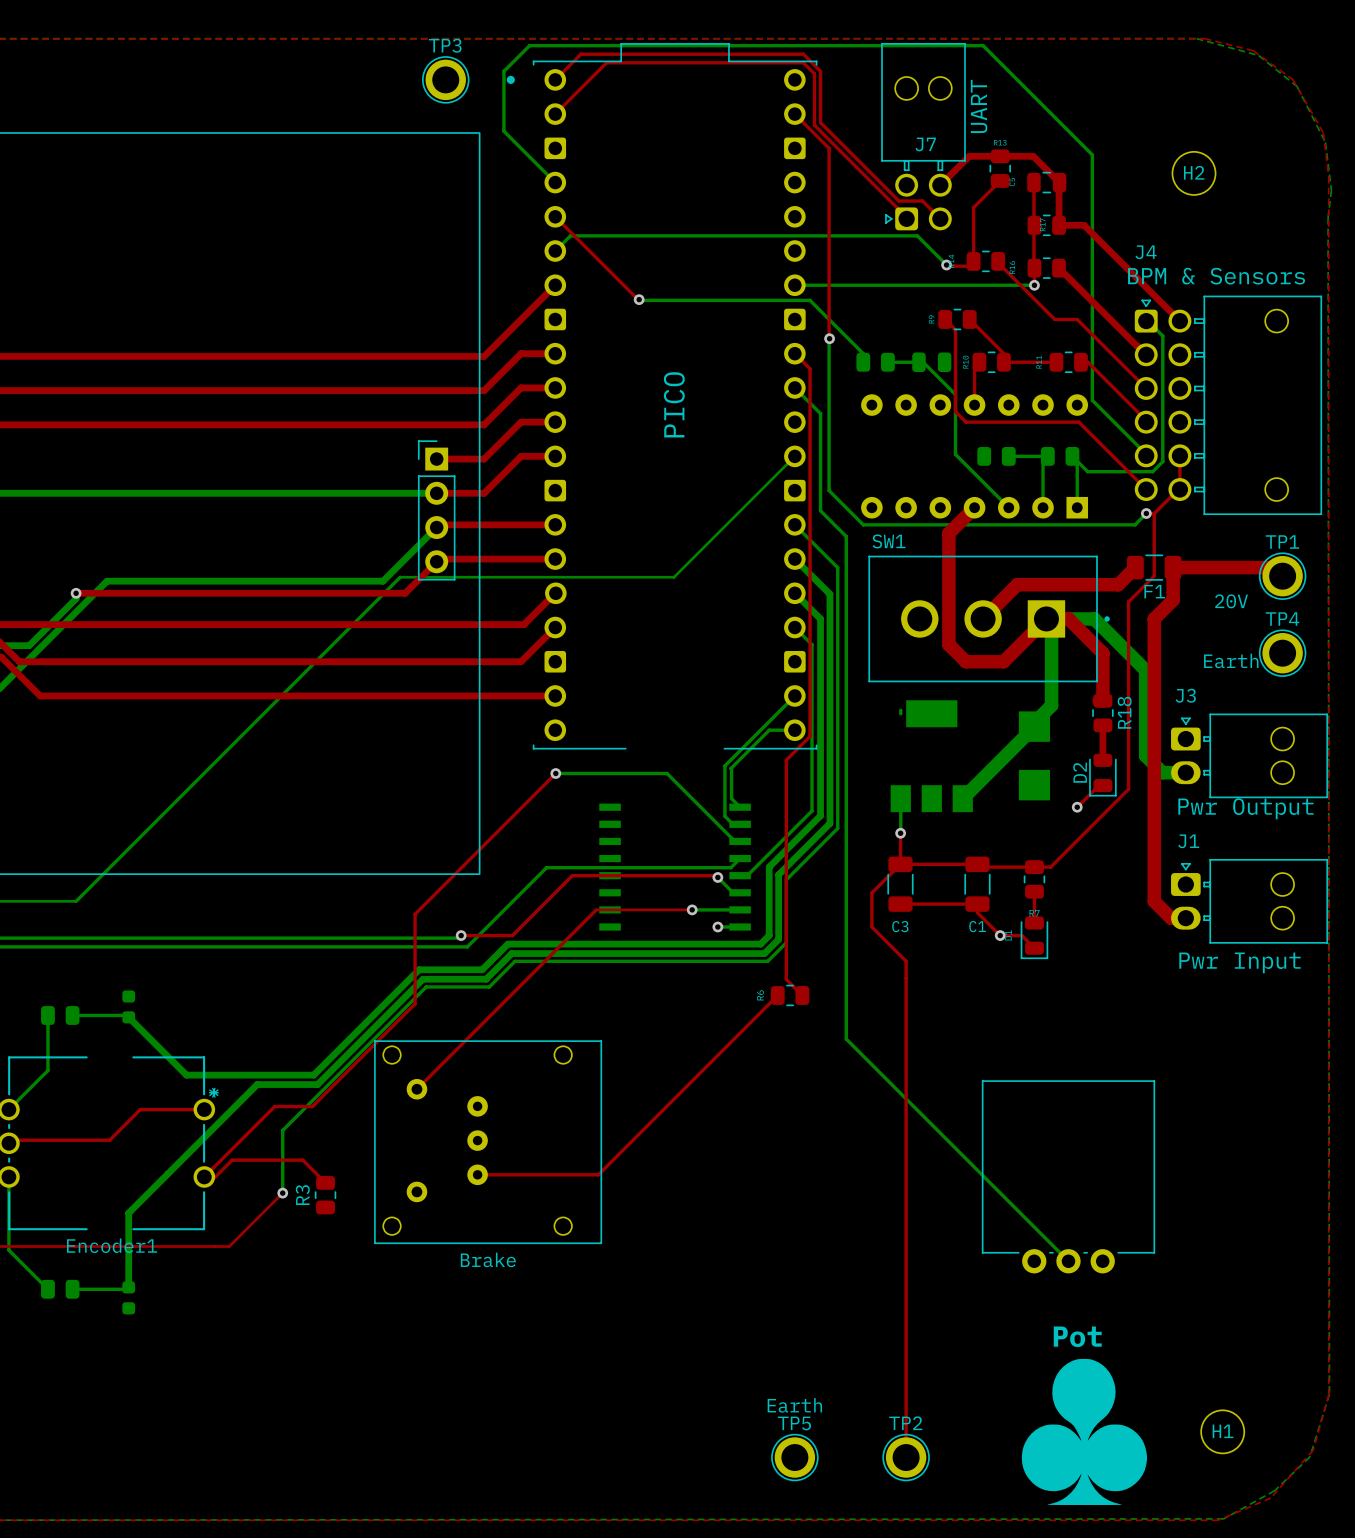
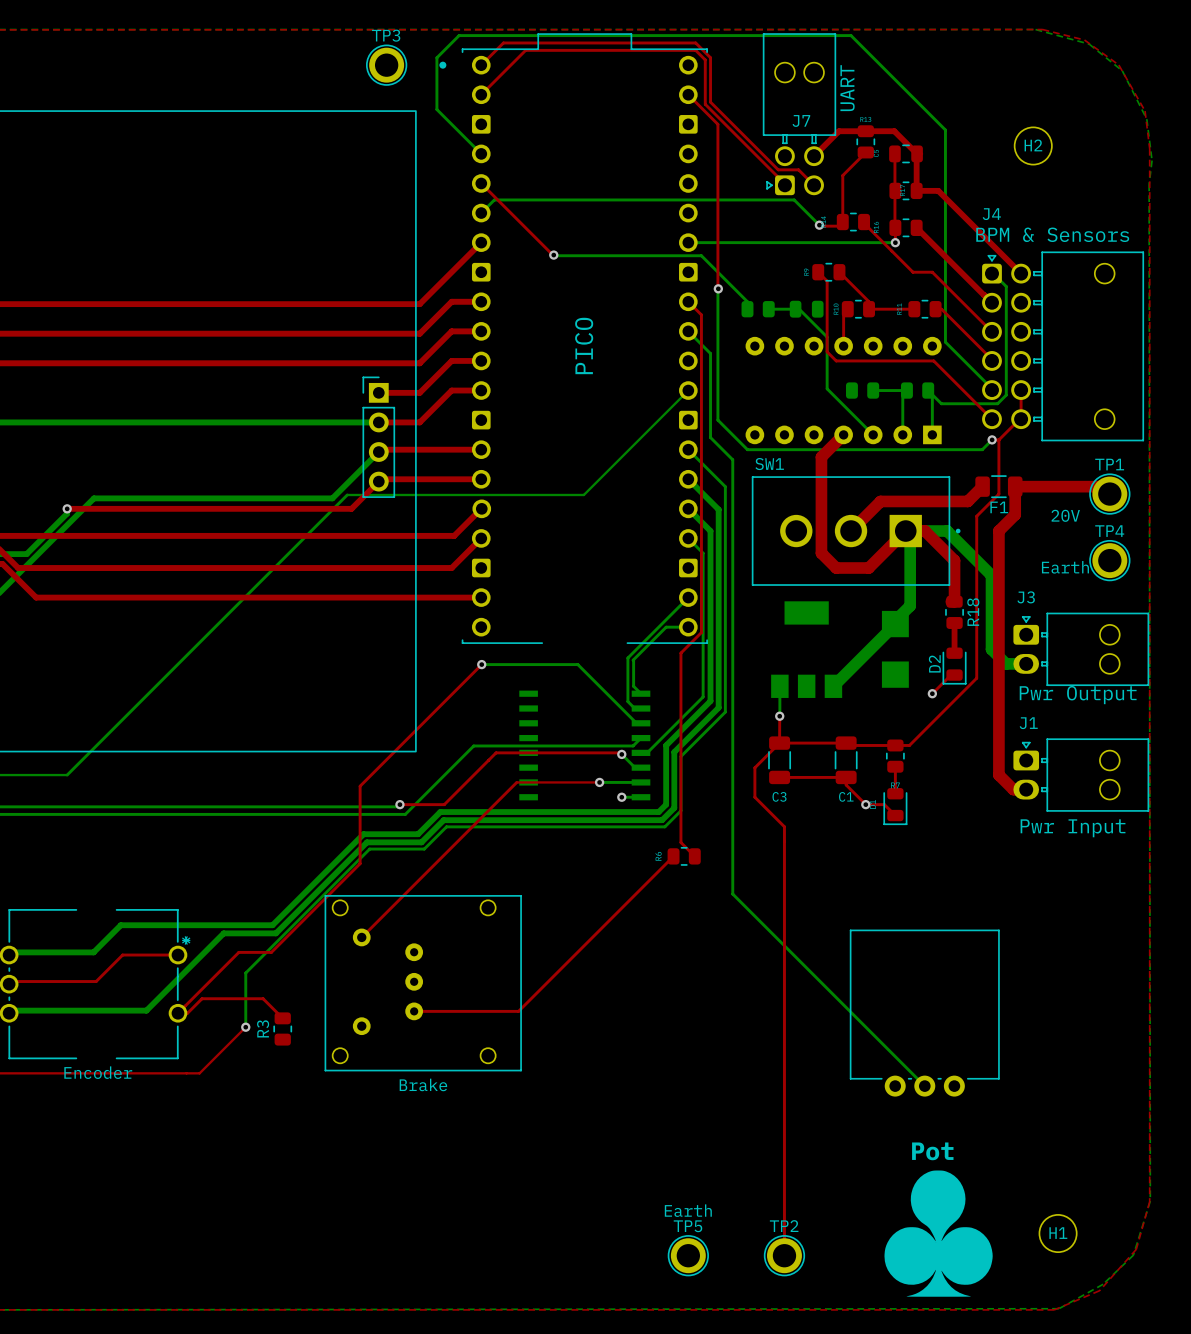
bottom track: (900, 710) (900, 713) -> none
part: (128, 1006) -> none
bottom track: (47, 1015) (47, 1070) (8, 1109) -> none
part: (60, 1015) -> none
bottom track: (72, 1015) (126, 1015) (186, 1075) -> (11, 952) (93, 952) (120, 925) (162, 925)
bottom track: (167, 1173) (128, 1213) (128, 1287) (126, 1289) (72, 1289) -> (146, 1010) (11, 1010)
bottom track: (8, 1176) (8, 1250) (47, 1289) -> none
Encoder1 name: Encoder1 (112, 1245) -> Encoder (98, 1072)
part: (60, 1289) -> none
part: (128, 1297) -> none

